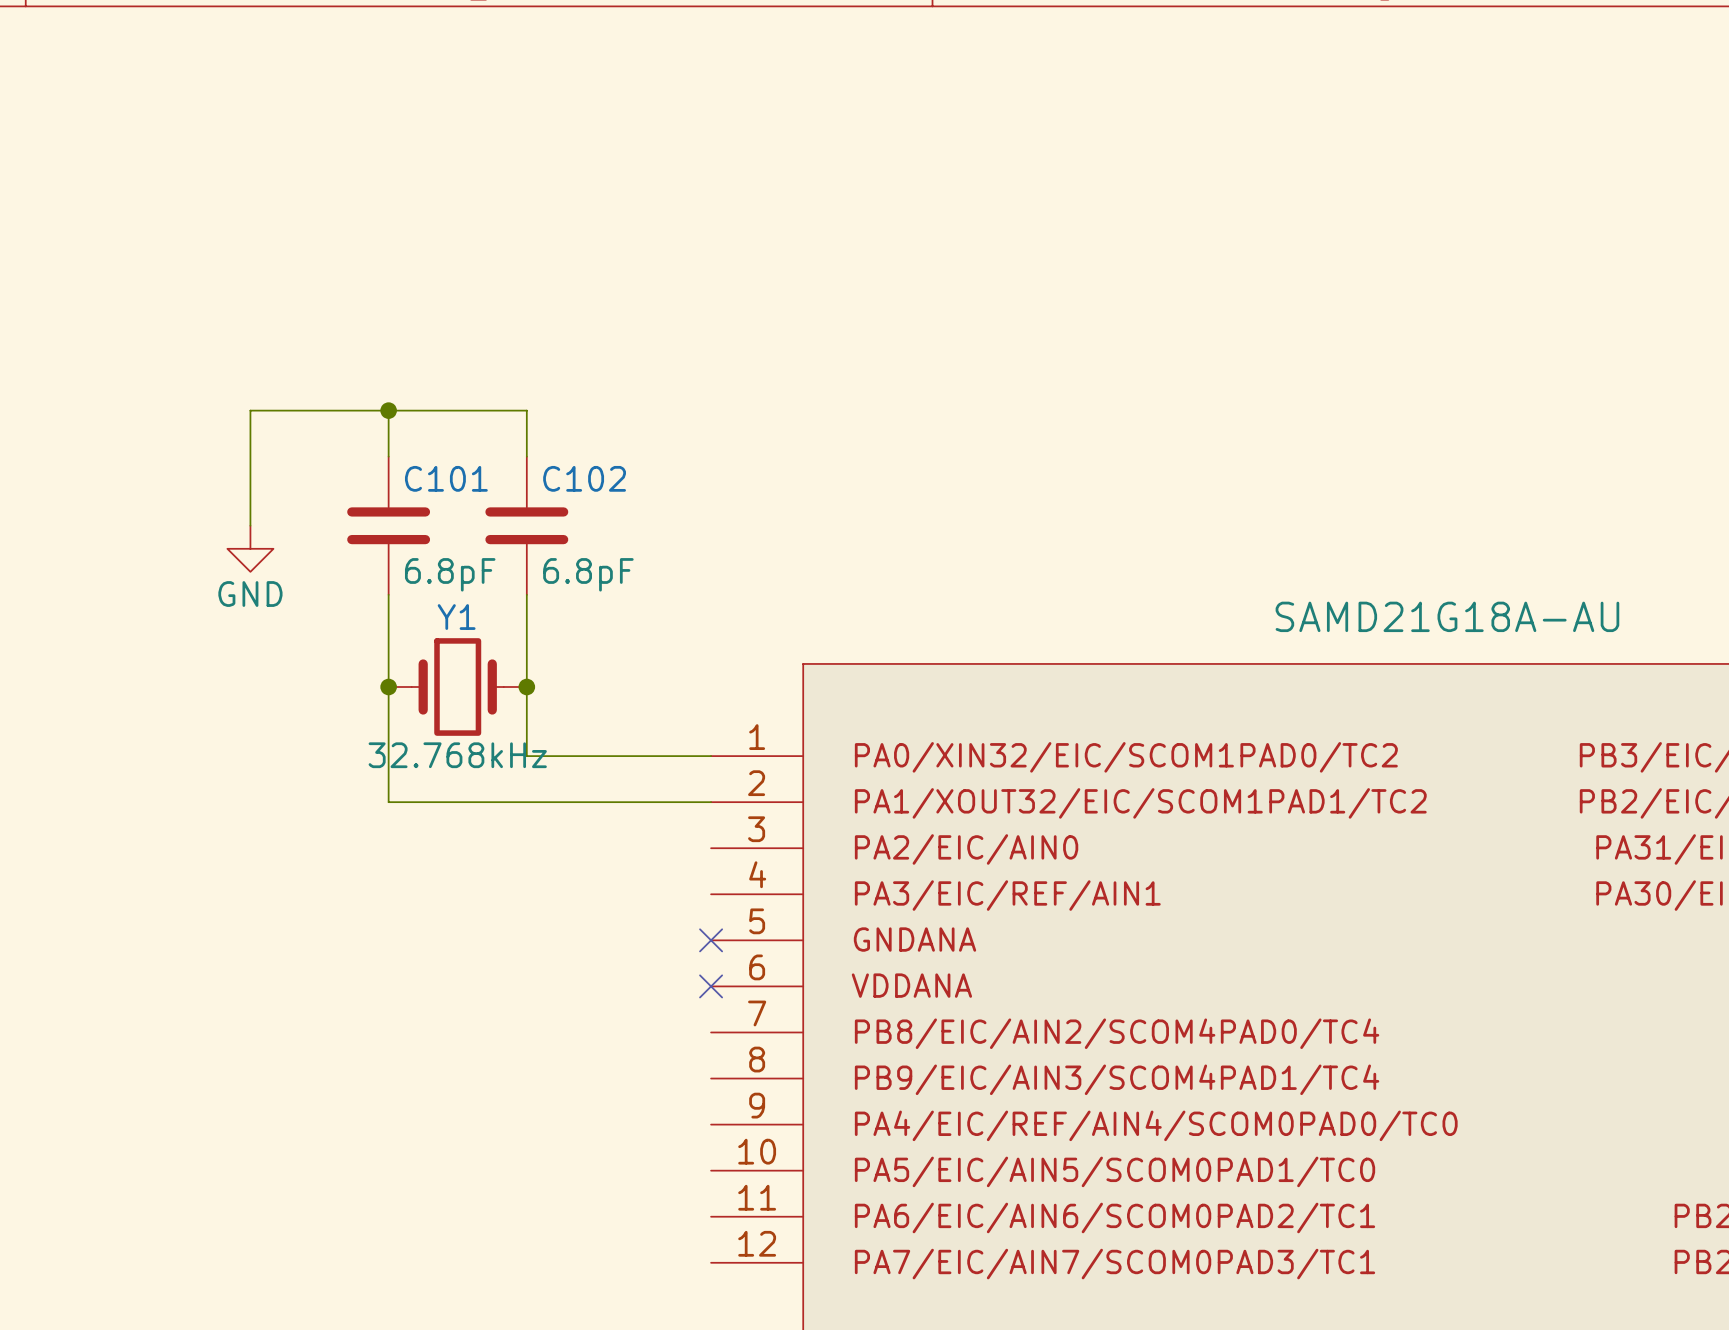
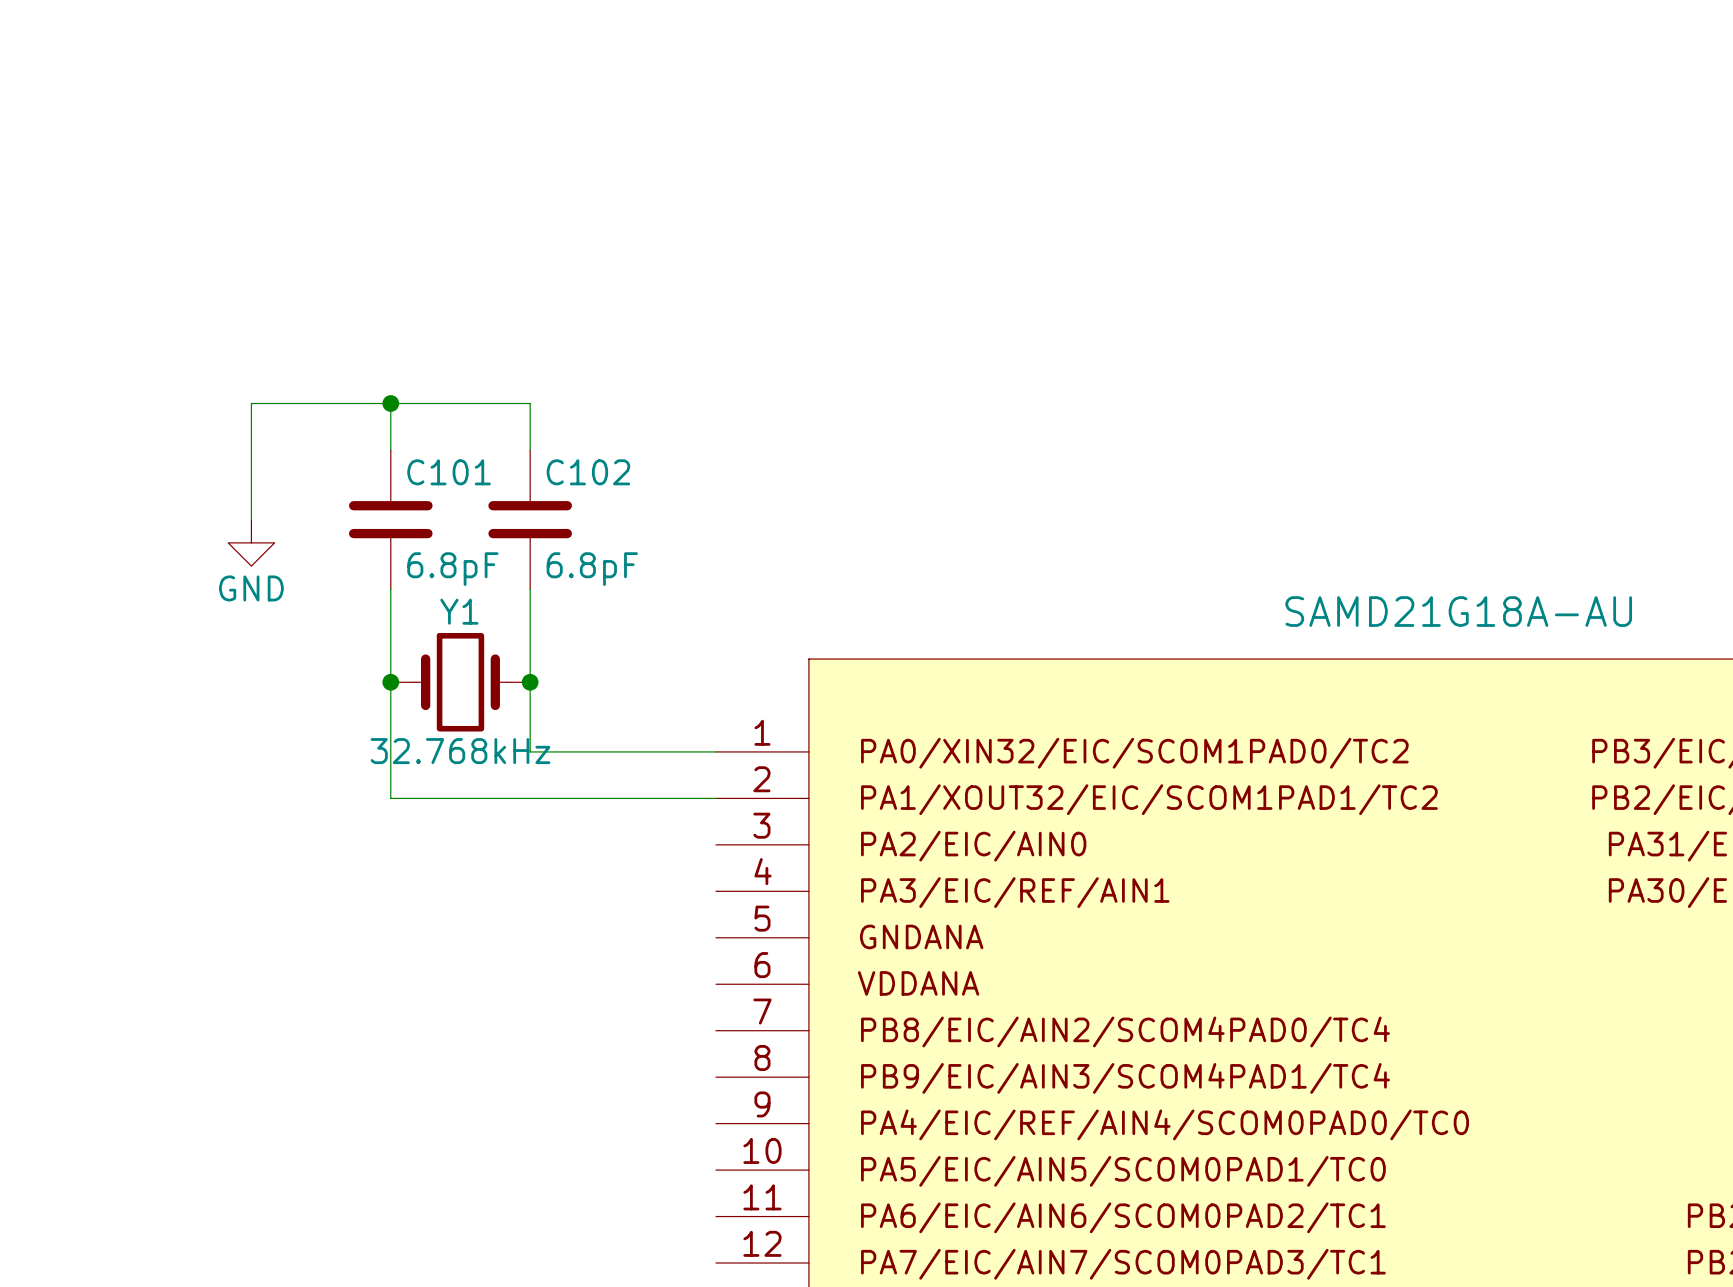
no-connect mark: (711, 940) -> none
no-connect mark: (711, 986) -> none

